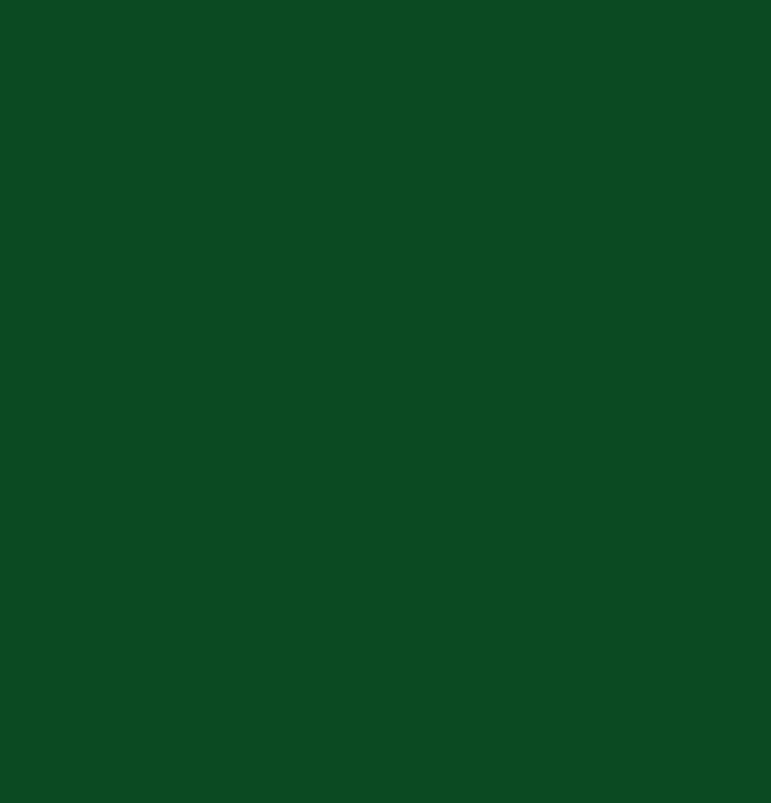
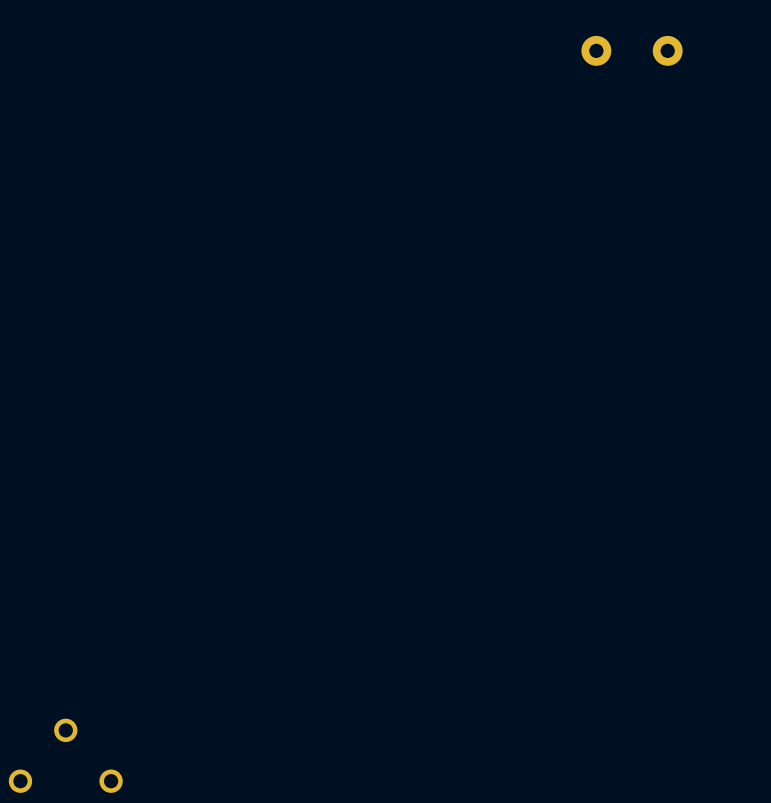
part: none -> (632, 50)
part: none -> (65, 755)

